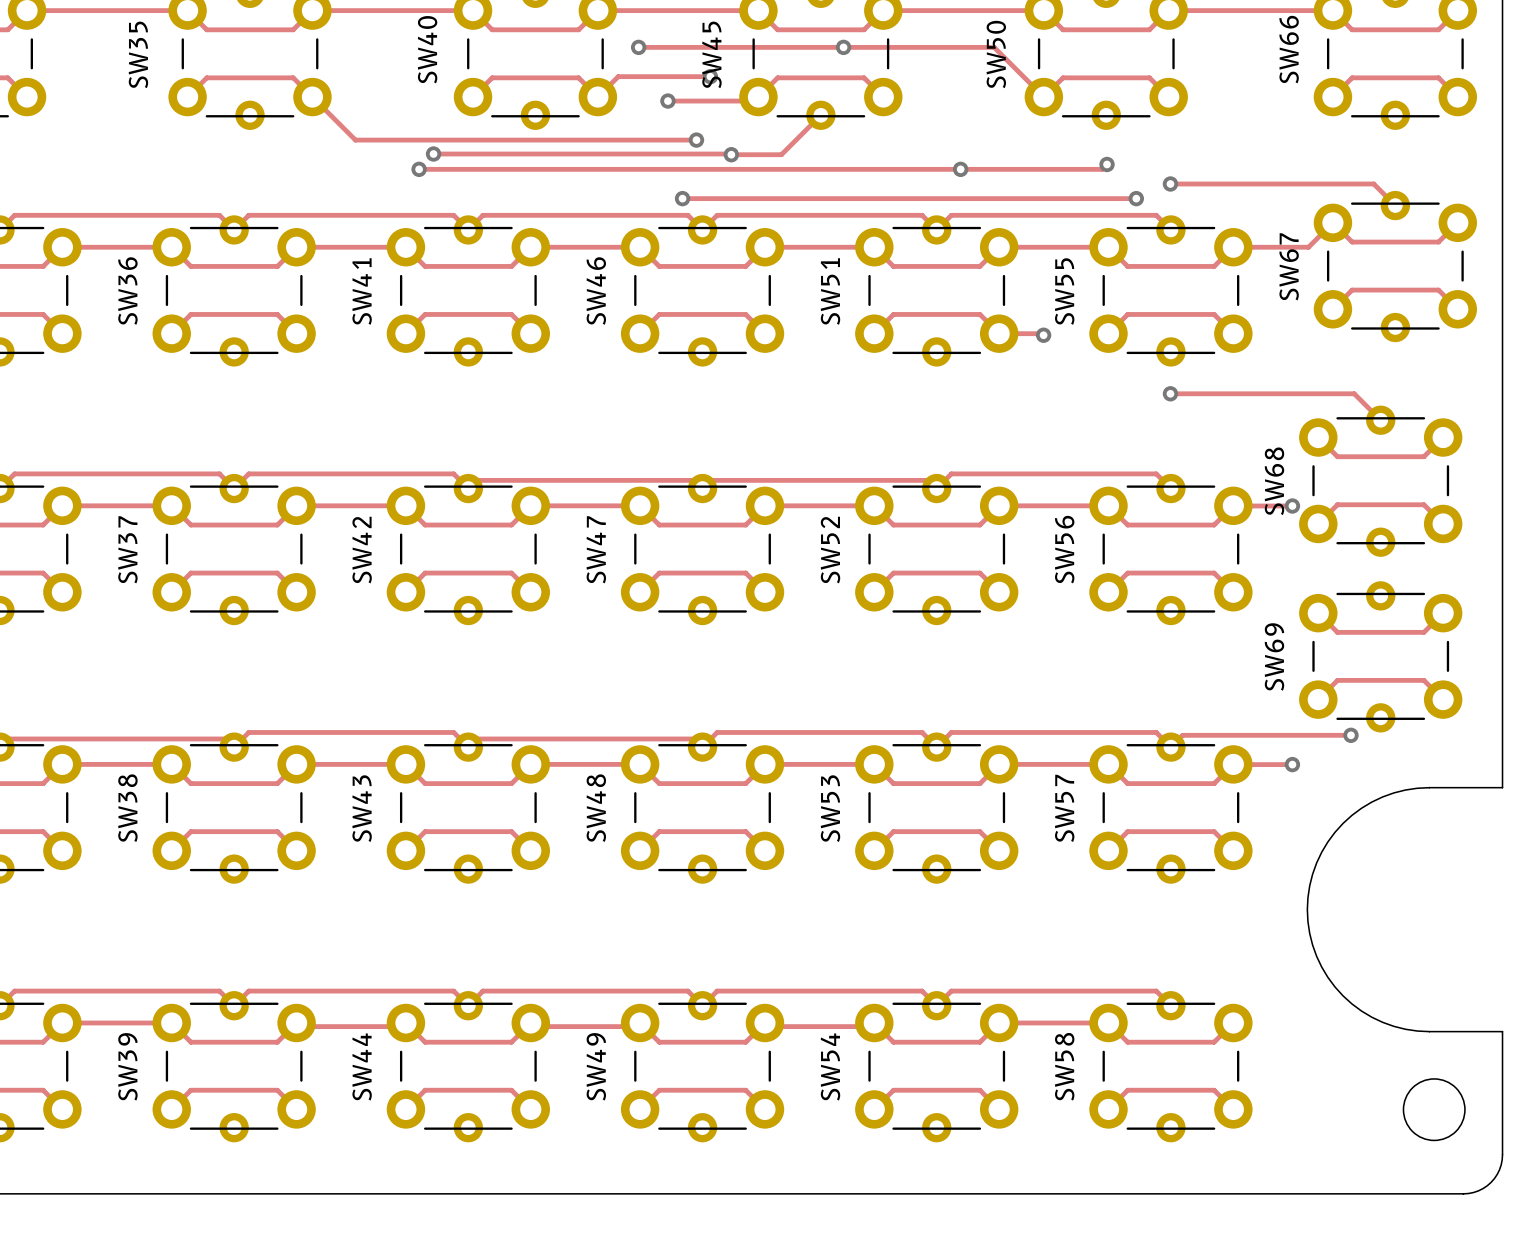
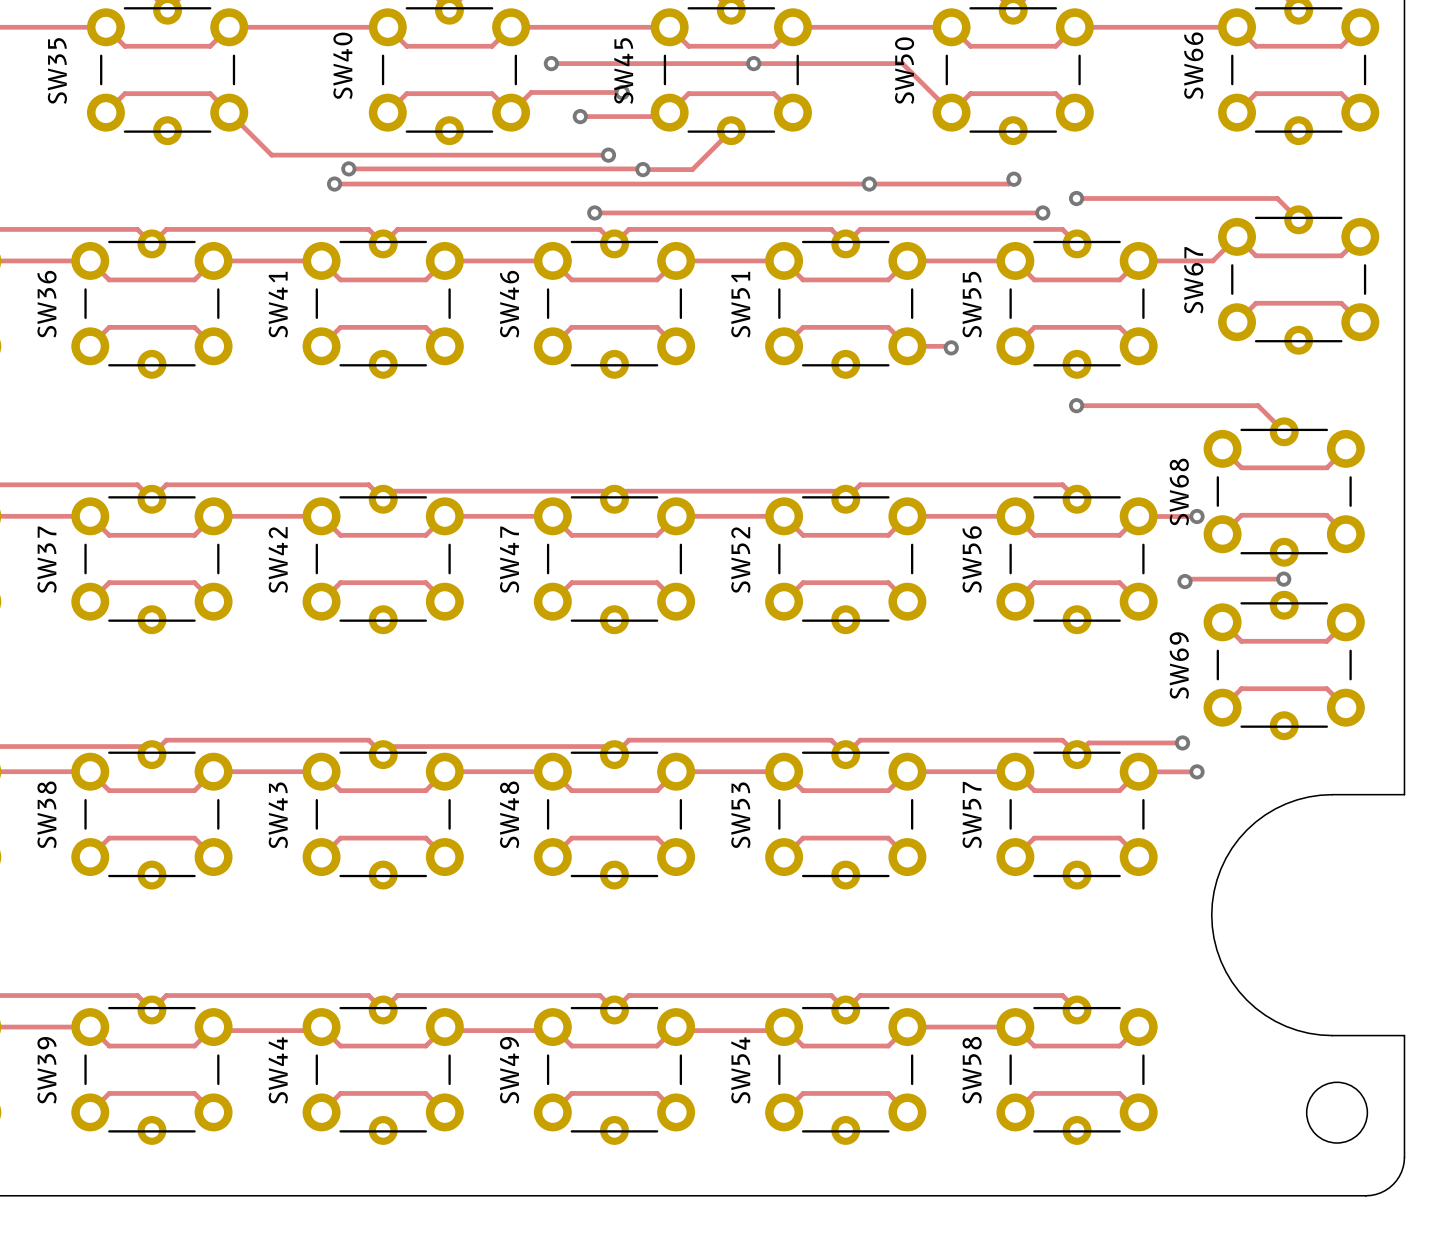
track: none -> (1283, 579) (1187, 579) (1184, 581)
via: none -> (1283, 579)
via: none -> (1184, 581)
track: (1277, 735) (1350, 735) -> none
via position: (1350, 735) -> (1182, 742)

